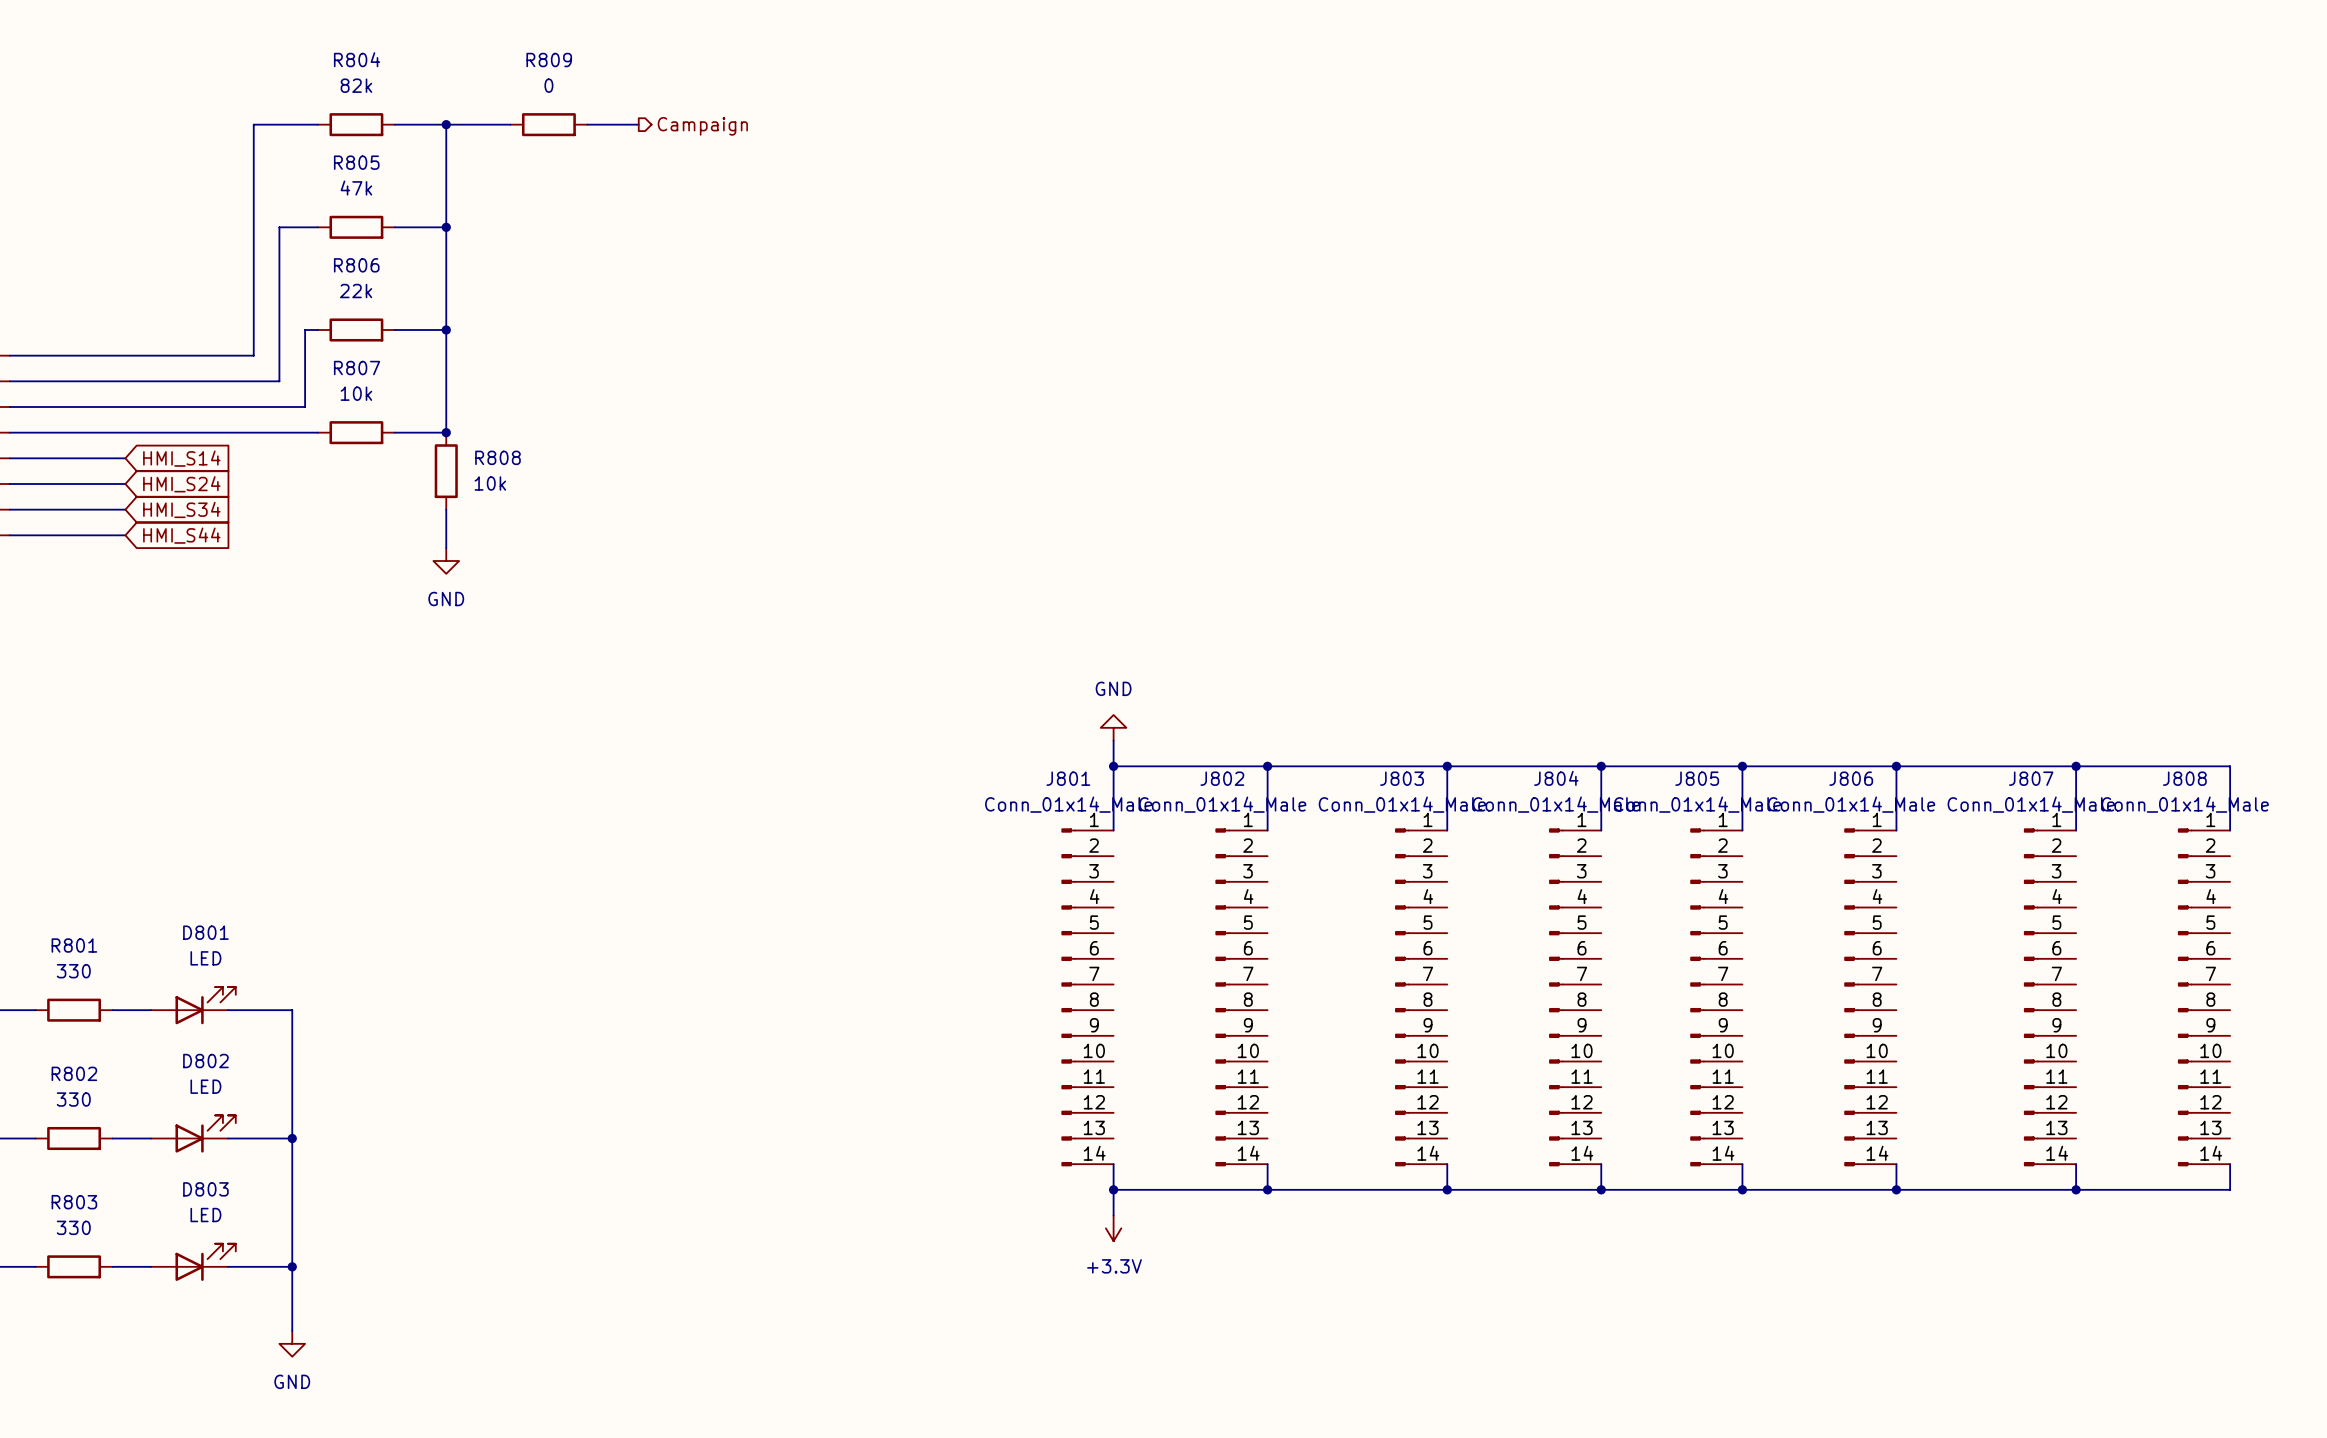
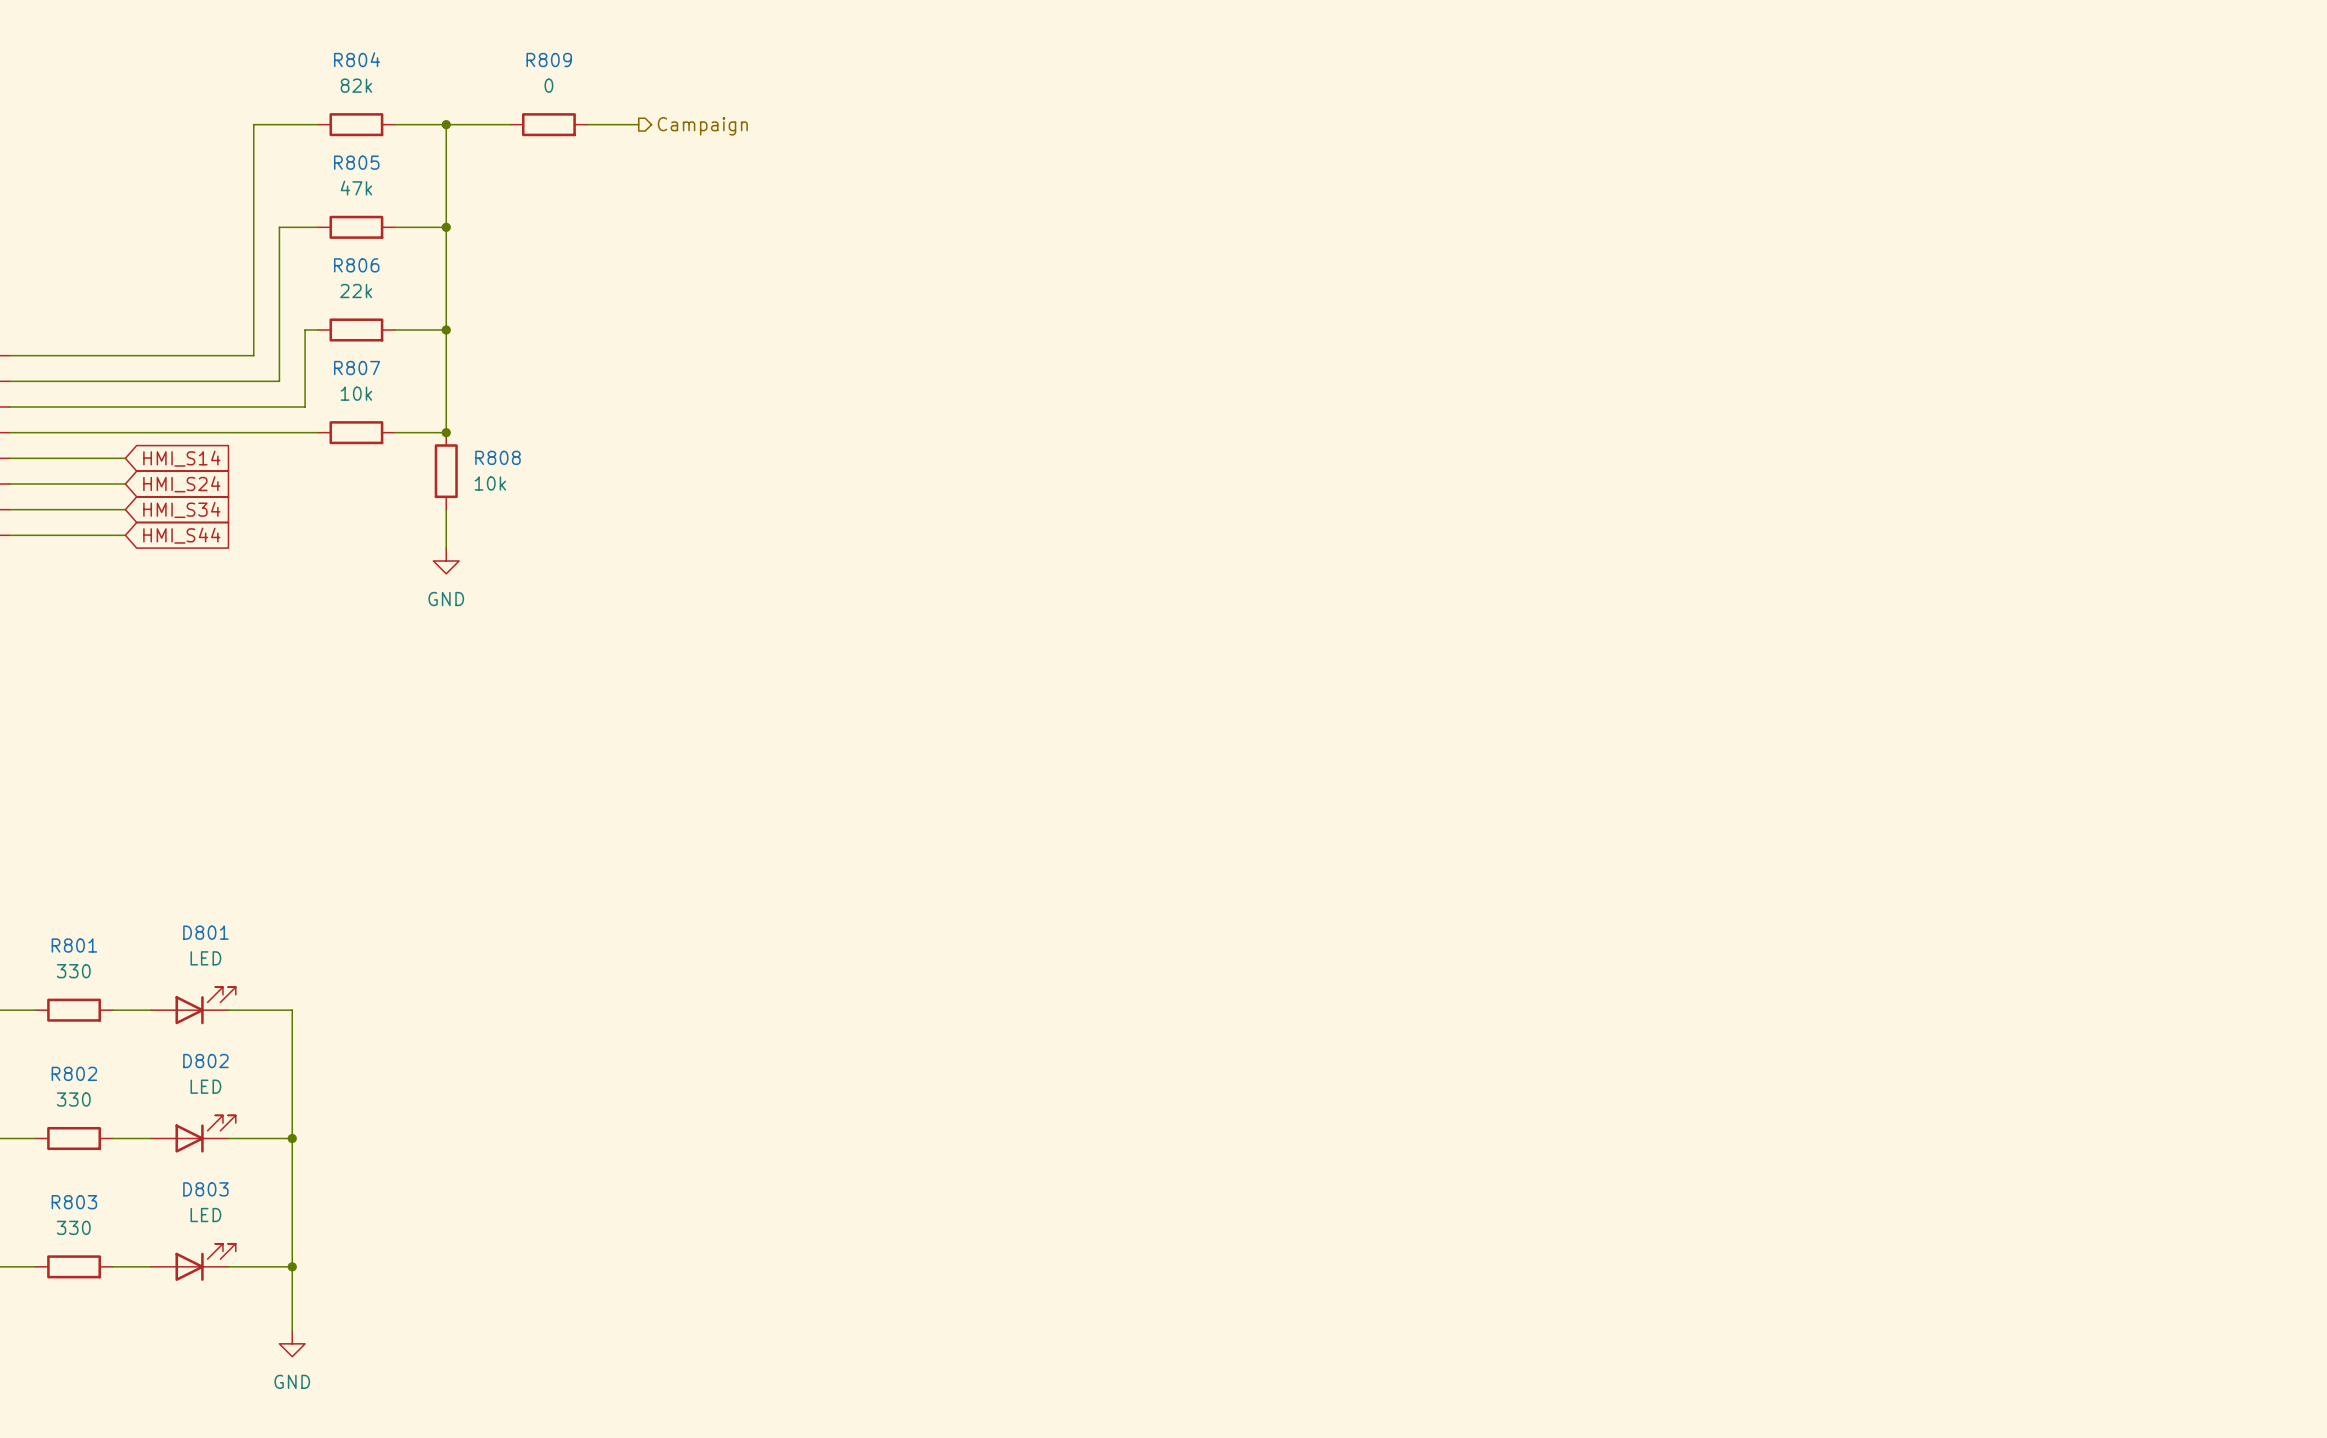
power symbol: GND (1113, 727) -> none
wire: (1113, 740) (1113, 830) -> none
wire: (1113, 766) (2230, 766) (2230, 830) -> none
junction: (1113, 766) -> none
wire: (1267, 766) (1267, 830) -> none
junction: (1267, 766) -> none
wire: (1447, 766) (1447, 830) -> none
junction: (1447, 766) -> none
wire: (1601, 766) (1601, 830) -> none
junction: (1601, 766) -> none
wire: (1742, 766) (1742, 830) -> none
junction: (1742, 766) -> none
wire: (1896, 766) (1896, 830) -> none
junction: (1896, 766) -> none
wire: (2076, 766) (2076, 830) -> none
junction: (2076, 766) -> none
J801: Conn_01x14_Male (1087, 997) -> none
J802: Conn_01x14_Male (1241, 997) -> none
J803: Conn_01x14_Male (1421, 997) -> none
J804: Conn_01x14_Male (1575, 997) -> none
J805: Conn_01x14_Male (1716, 997) -> none
J806: Conn_01x14_Male (1870, 997) -> none
J807: Conn_01x14_Male (2050, 997) -> none
J808: Conn_01x14_Male (2204, 997) -> none
wire: (1113, 1164) (1113, 1215) -> none
wire: (1267, 1164) (1267, 1189) -> none
wire: (1447, 1164) (1447, 1189) -> none
wire: (1601, 1164) (1601, 1189) -> none
wire: (1742, 1164) (1742, 1189) -> none
wire: (1896, 1164) (1896, 1189) -> none
wire: (2076, 1164) (2076, 1189) -> none
wire: (2230, 1164) (2230, 1189) (1113, 1189) -> none
junction: (1113, 1189) -> none
junction: (1267, 1189) -> none
junction: (1447, 1189) -> none
junction: (1601, 1189) -> none
junction: (1742, 1189) -> none
junction: (1896, 1189) -> none
junction: (2076, 1189) -> none
power symbol: +3.3V (1113, 1228) -> none

